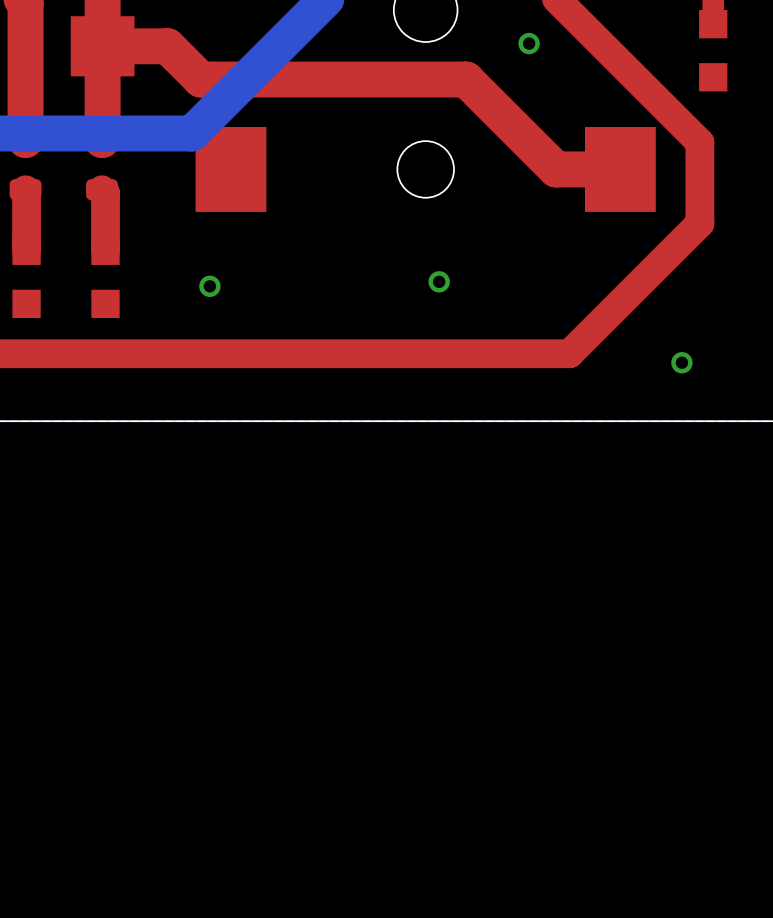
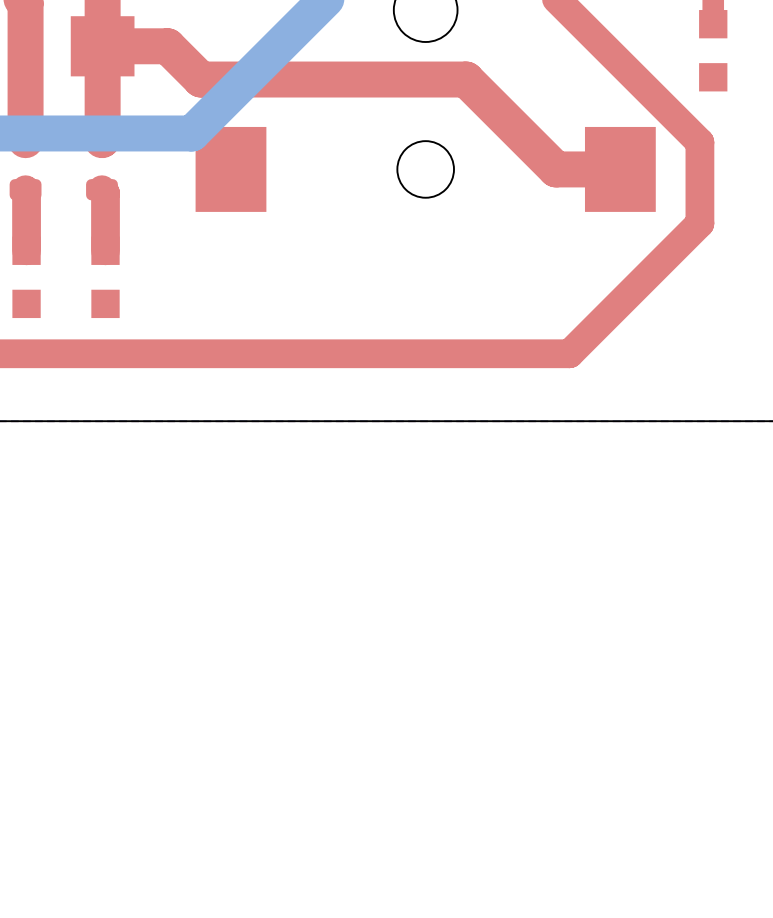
via: (529, 43) -> none
via: (439, 281) -> none
via: (209, 286) -> none
via: (681, 362) -> none

